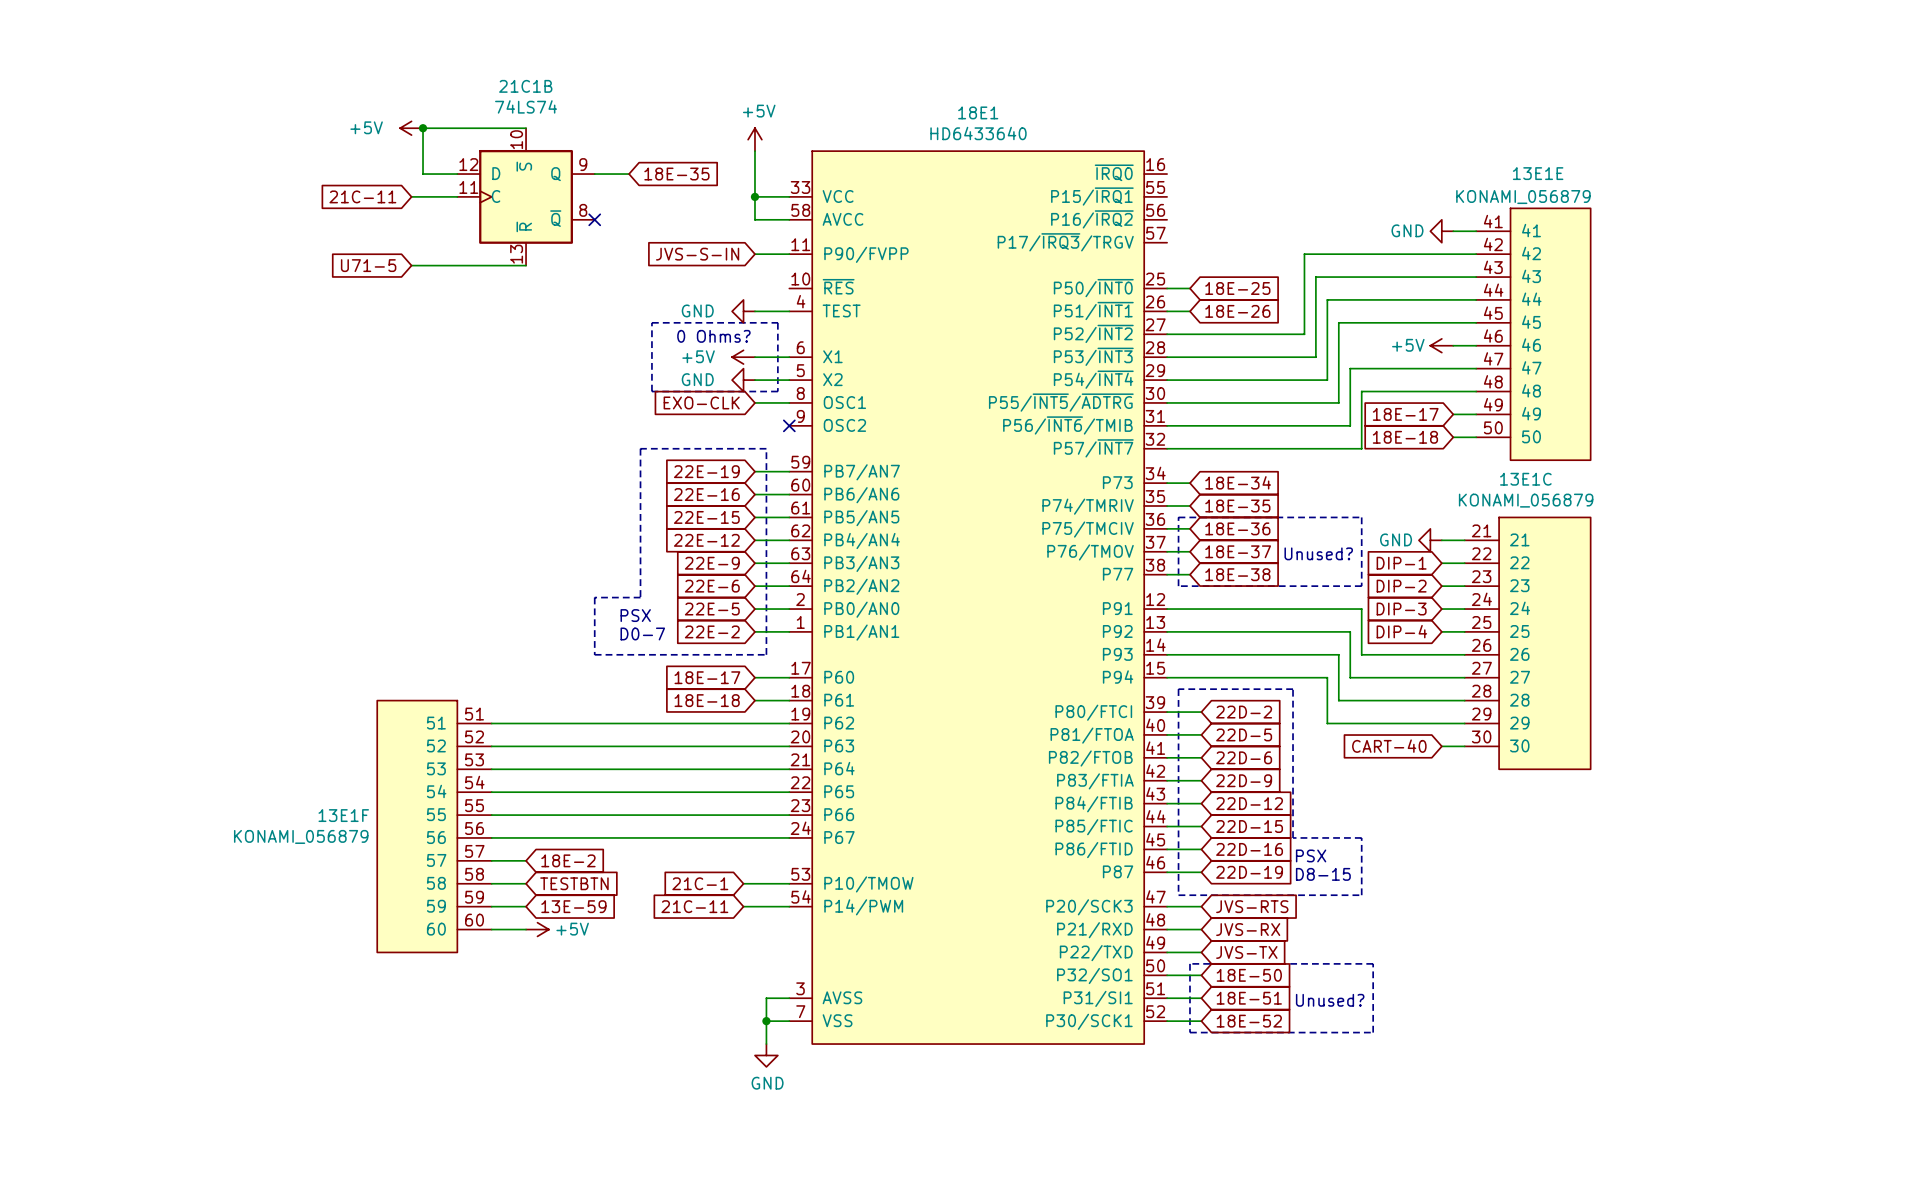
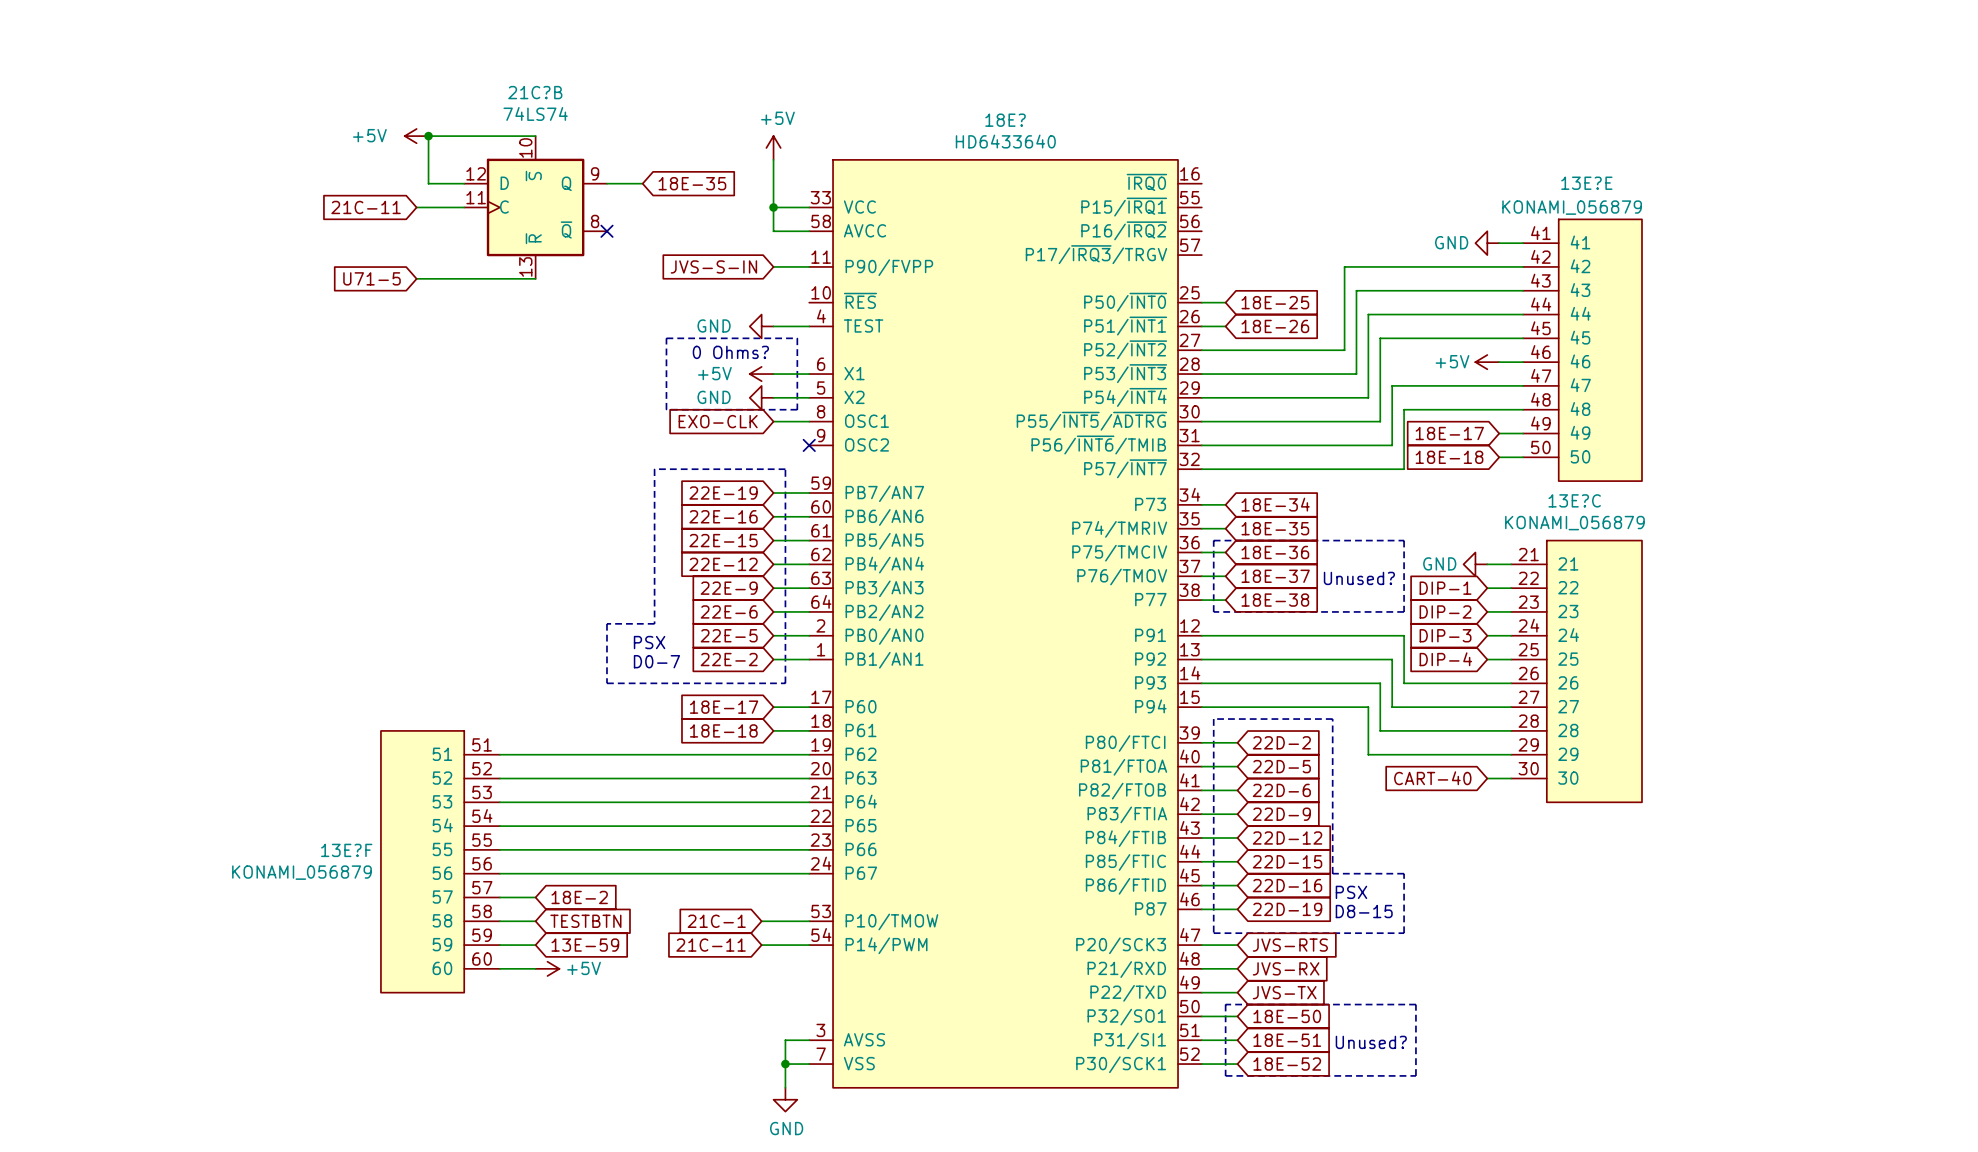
21C1B name: 21C1B (525, 86) -> 21C?B (535, 92)
18E1 name: 18E1 (978, 112) -> 18E? (1005, 120)
13E1E name: 13E1E (1538, 173) -> 13E?E (1586, 183)
13E1C name: 13E1C (1525, 479) -> 13E?C (1574, 500)
13E1F name: 13E1F (343, 815) -> 13E?F (346, 850)

